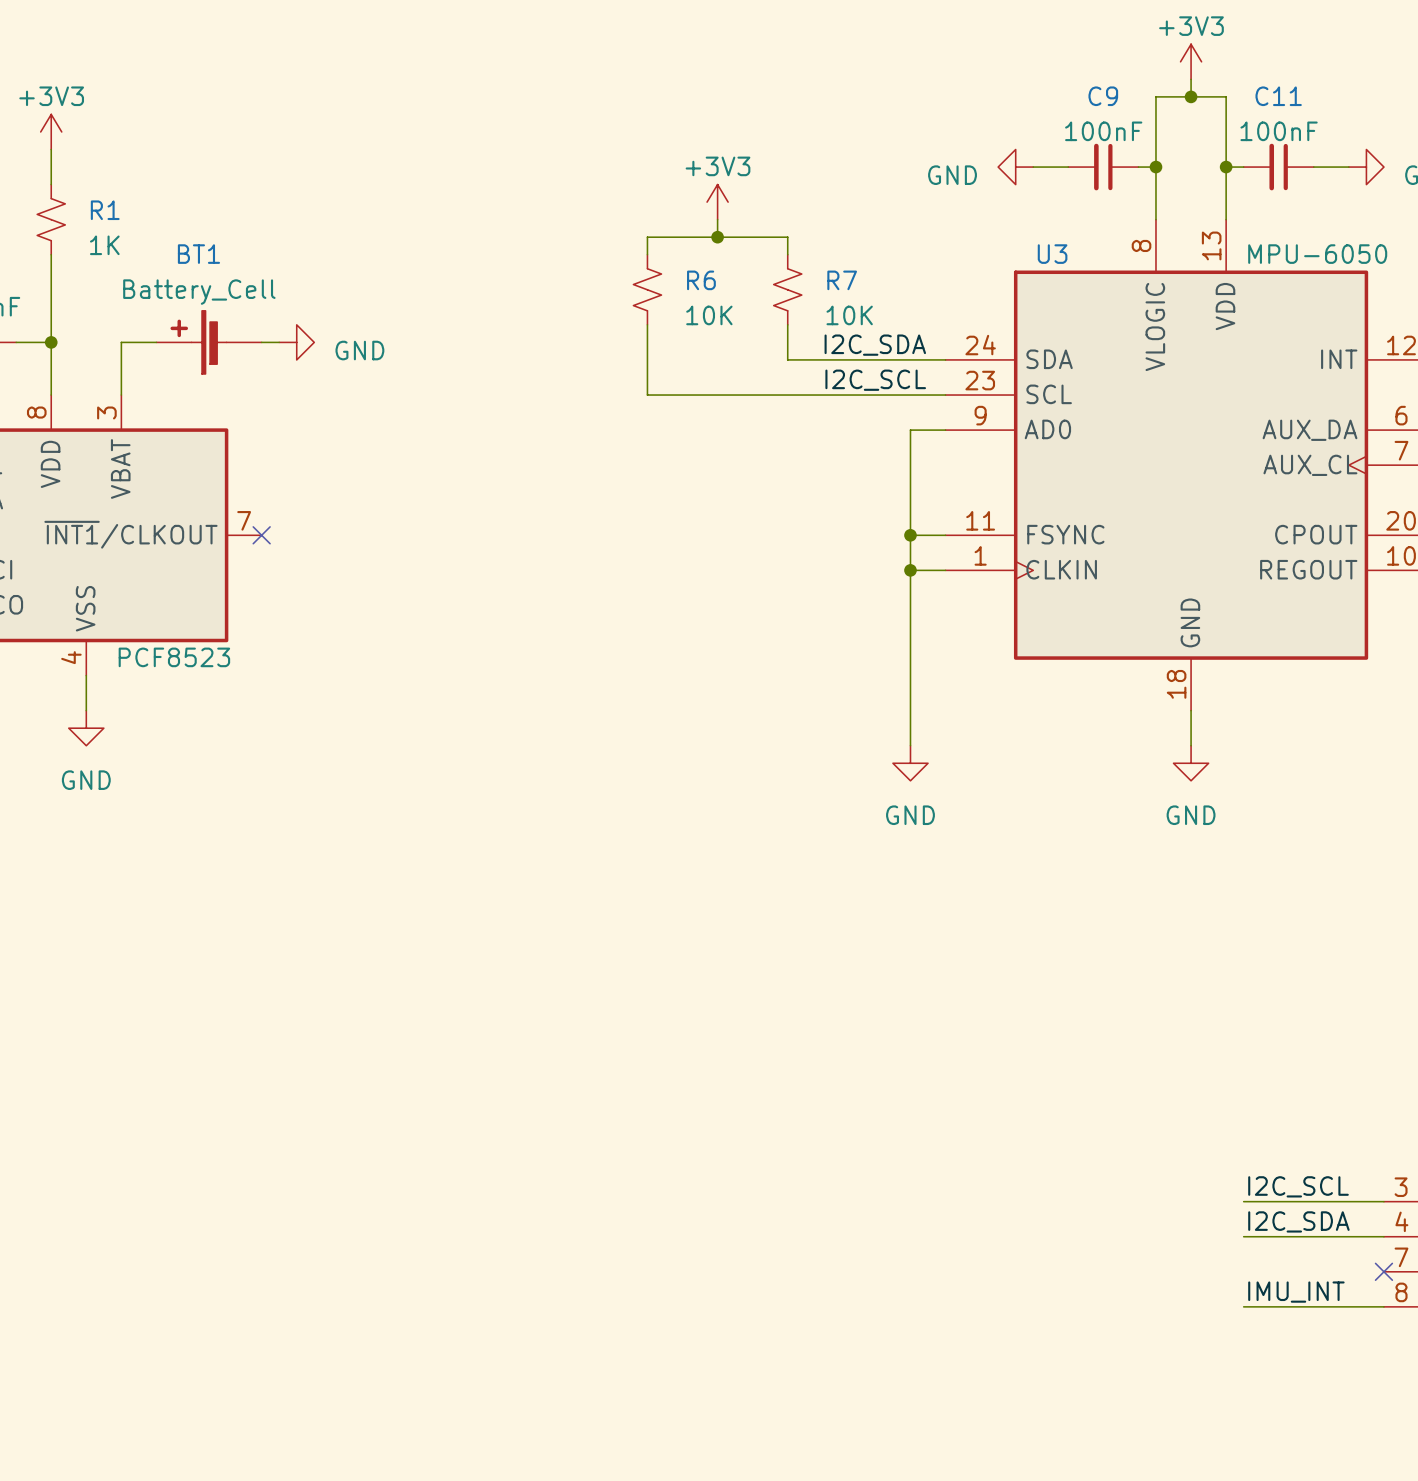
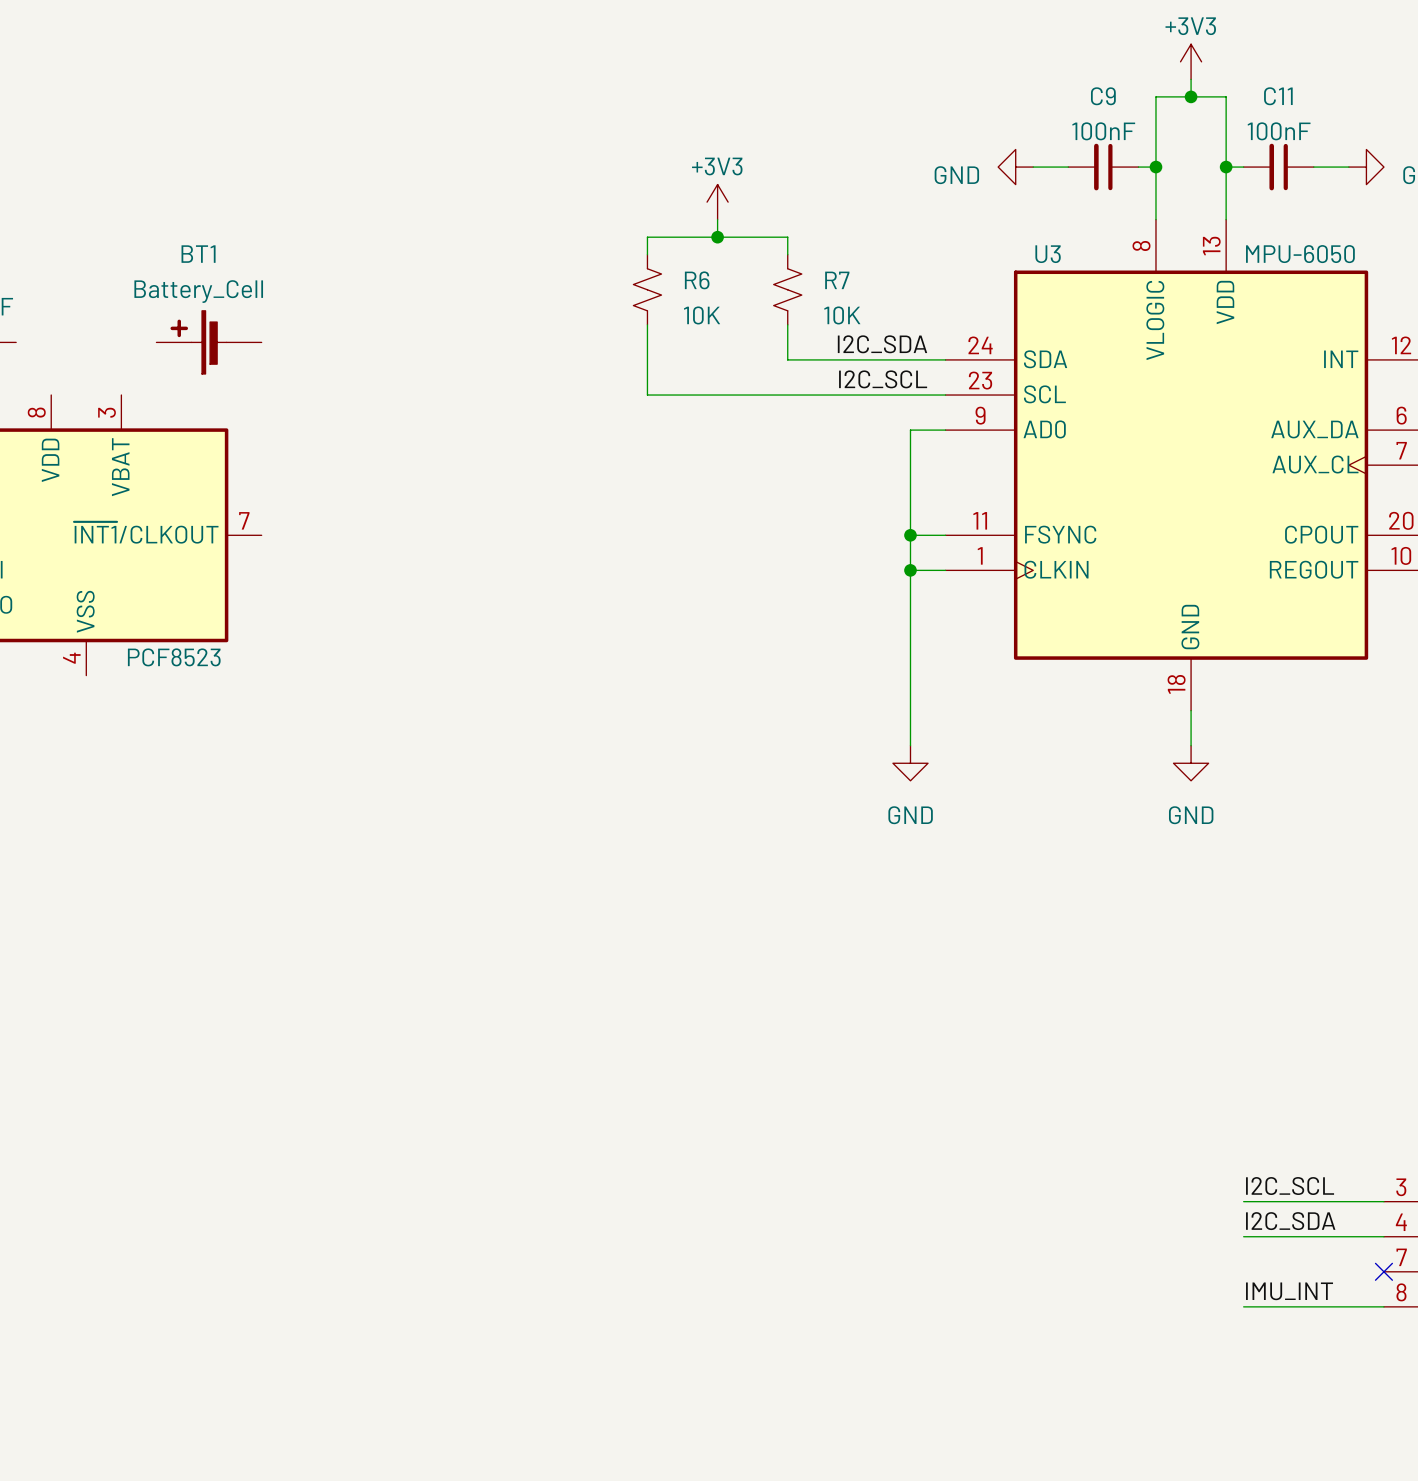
power symbol: +3V3 (51, 131) -> none
wire: (51, 149) (51, 184) -> none
R1: 1K (51, 219) -> none
wire: (51, 254) (51, 395) -> none
wire: (16, 342) (51, 342) -> none
junction: (51, 342) -> none
wire: (156, 342) (121, 342) (121, 395) -> none
wire: (261, 342) (279, 342) -> none
power symbol: GND (296, 342) -> none
no-connect mark: (261, 535) -> none
wire: (86, 675) (86, 710) -> none
power symbol: GND (86, 728) -> none

